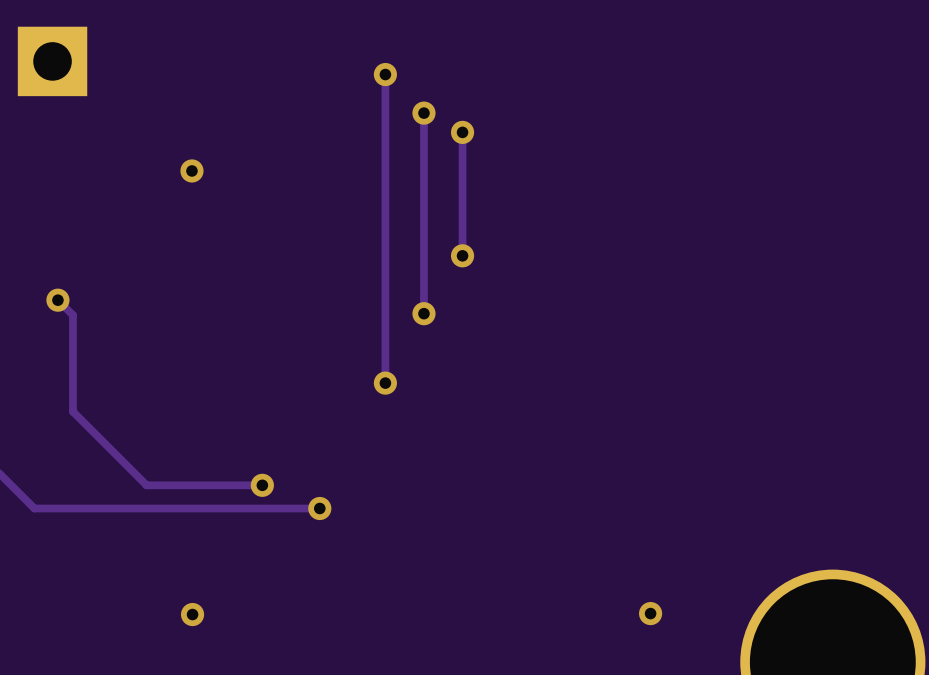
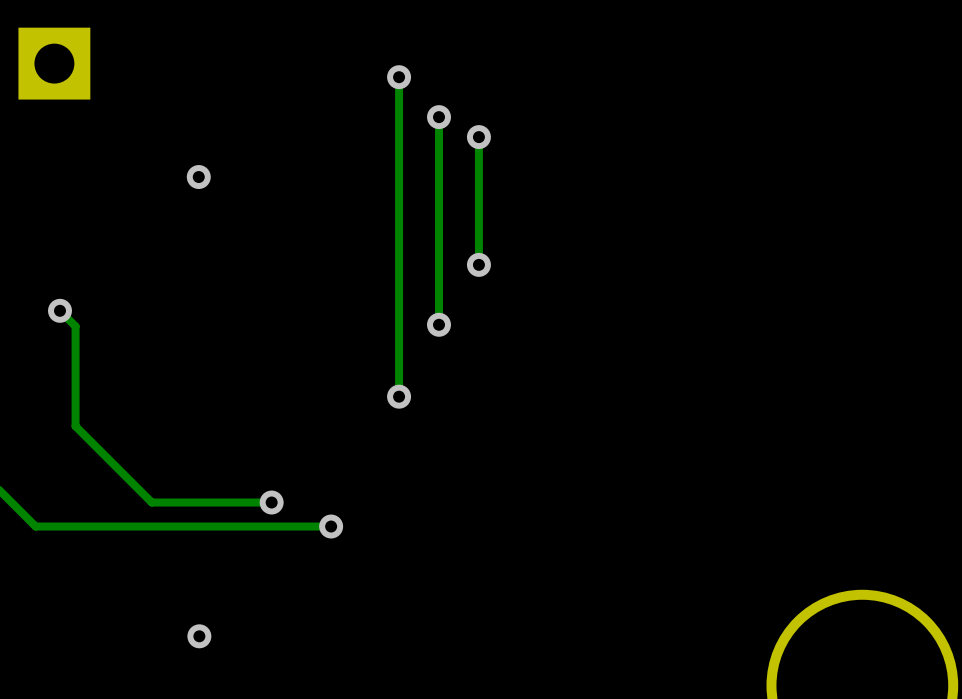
via: (650, 613) -> none

